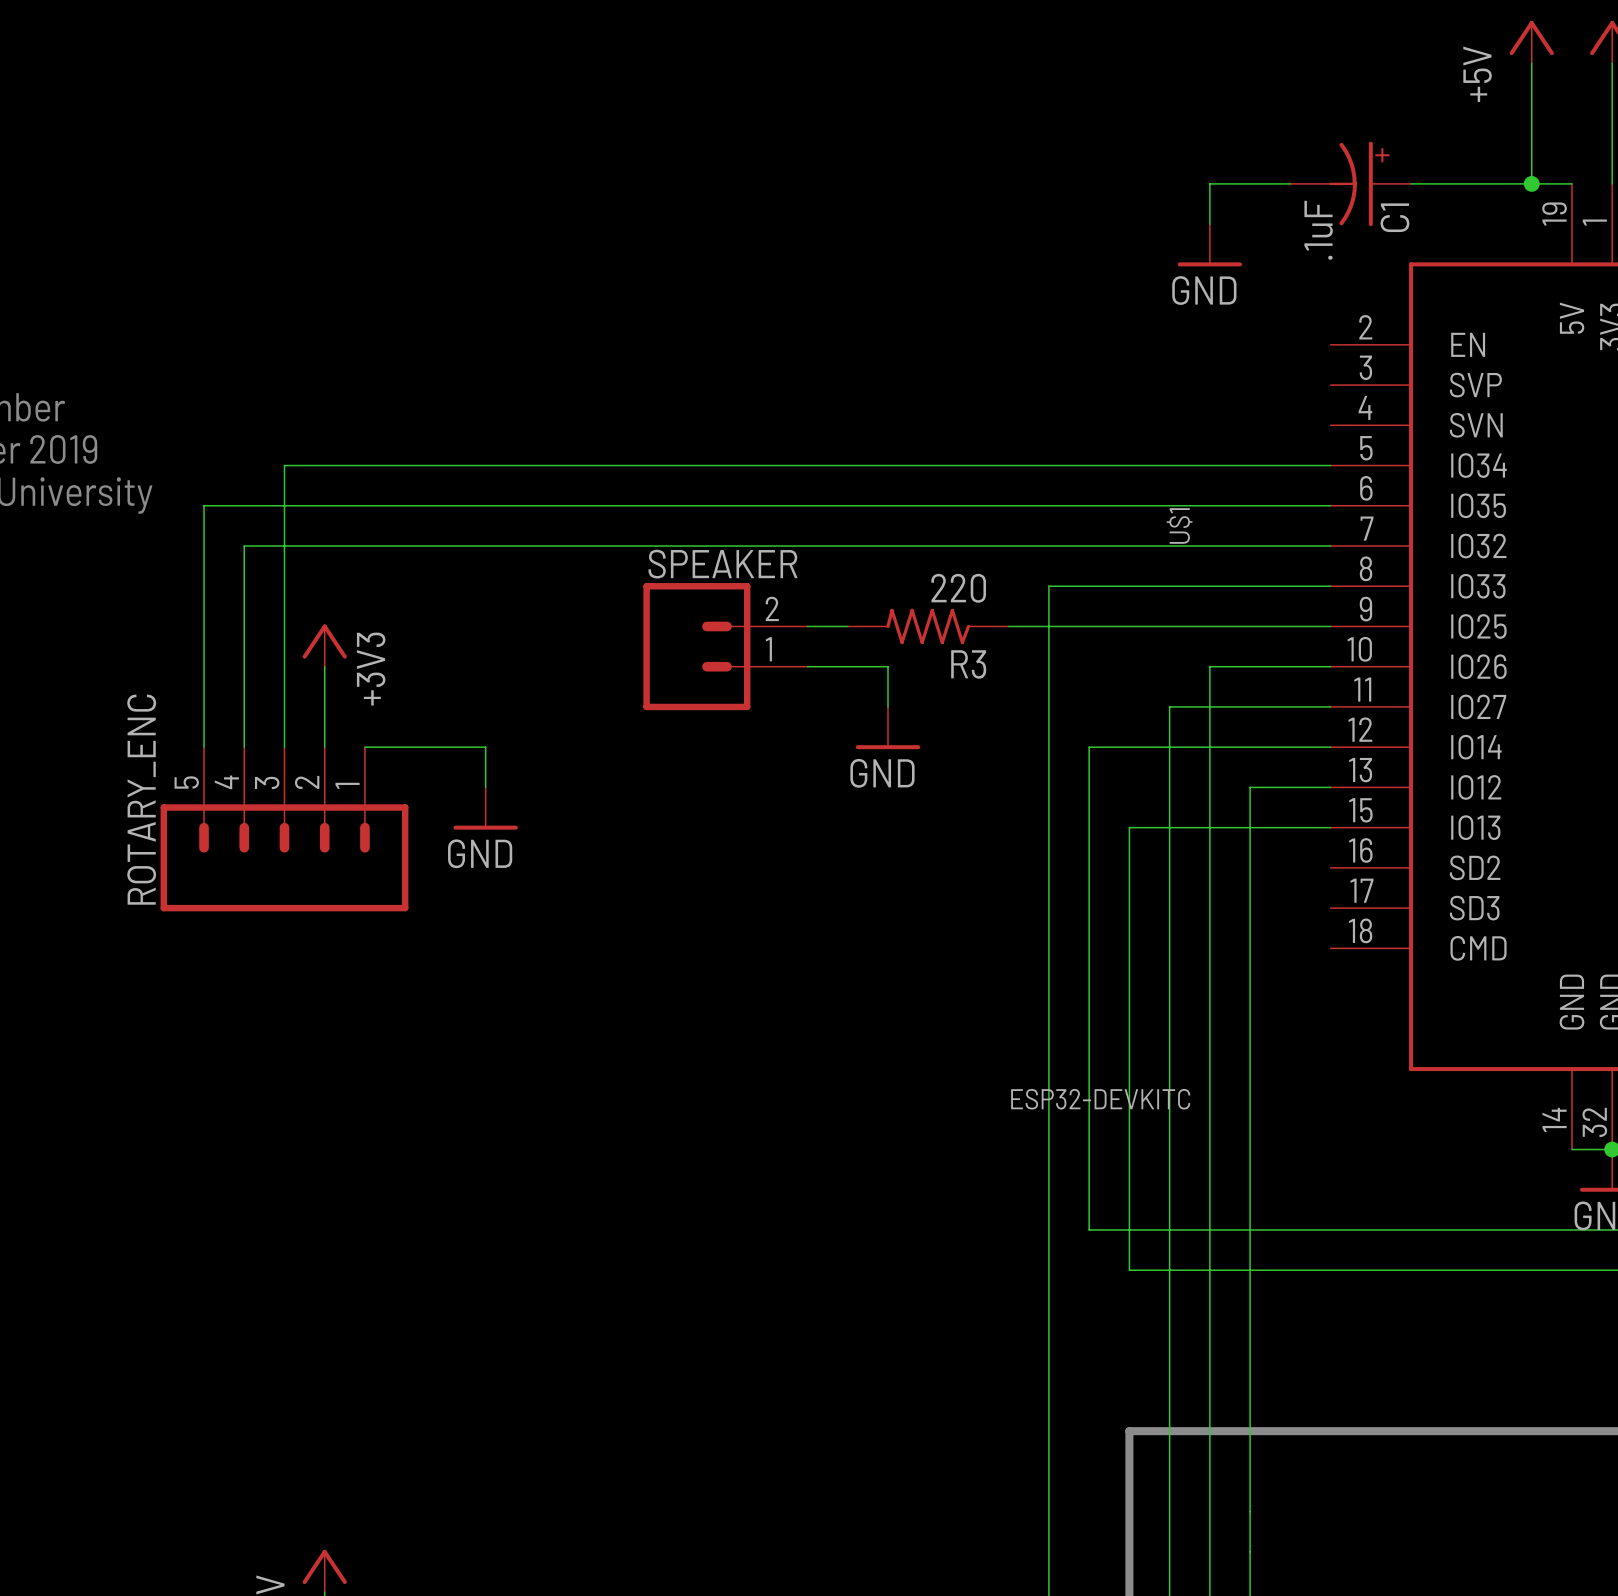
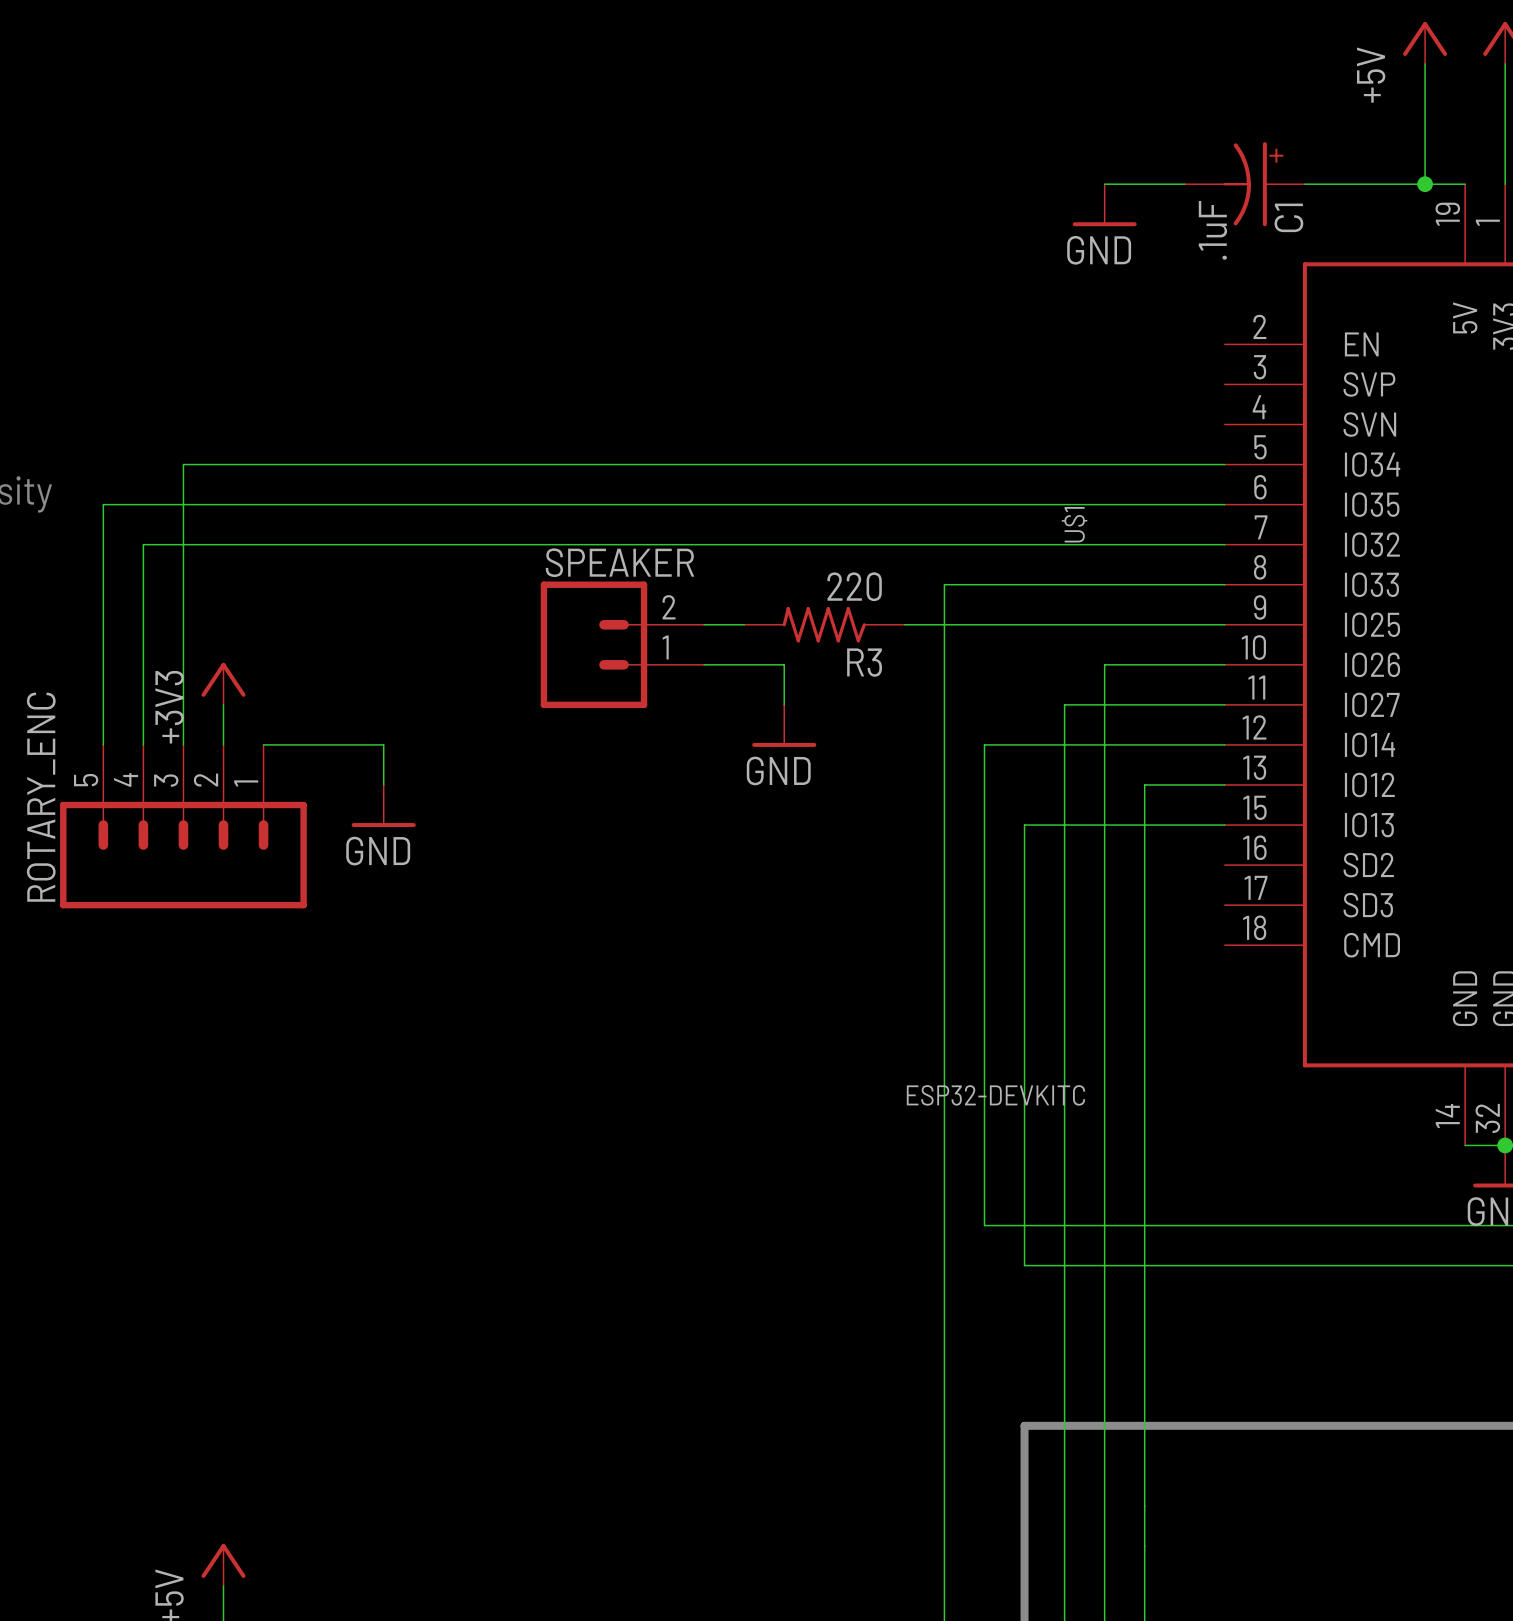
power symbol position: GND (1209, 245) -> GND (1104, 205)
power symbol position: +3V3 (324, 645) -> +3V3 (223, 683)
power symbol text position: +3V3 (371, 669) -> +3V3 (169, 707)

